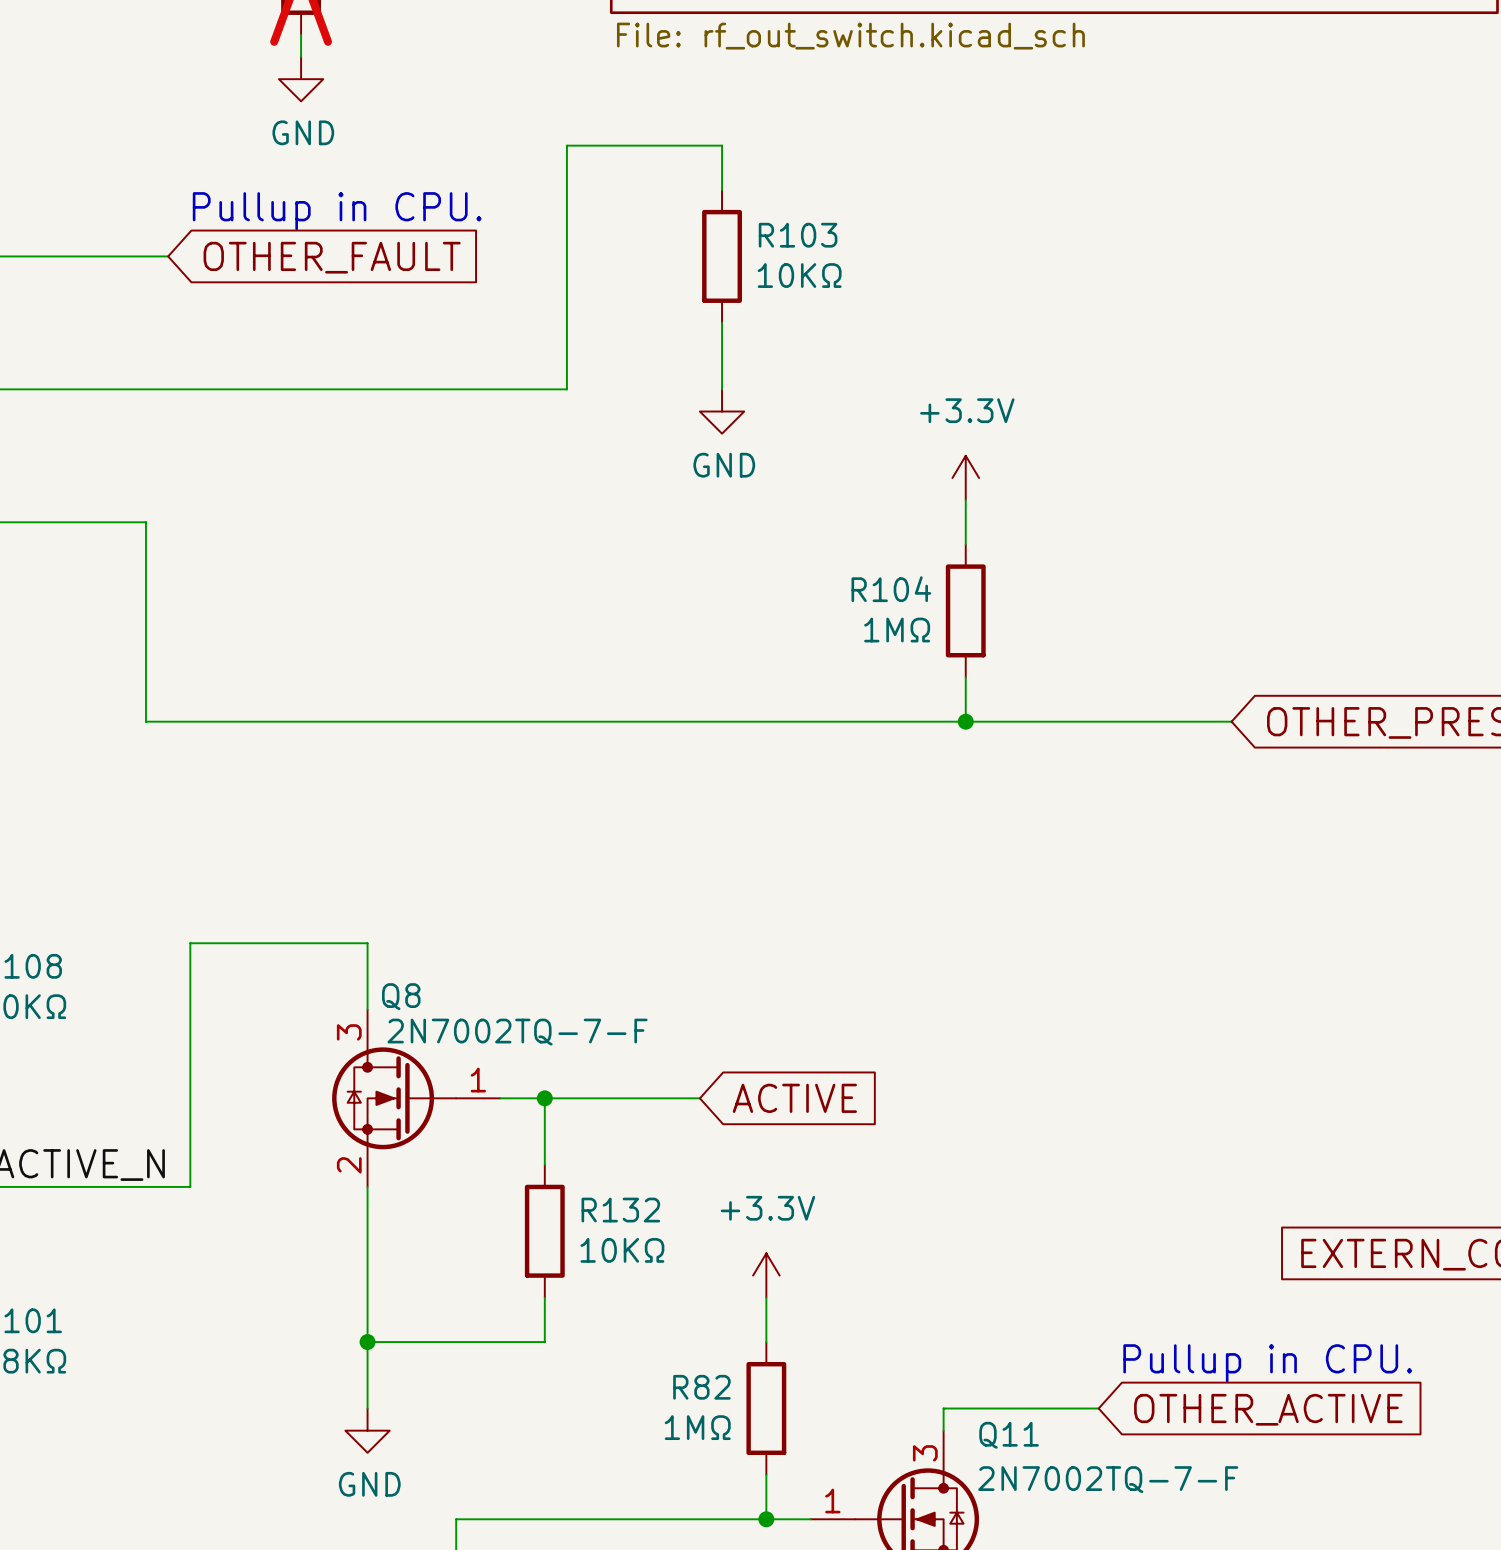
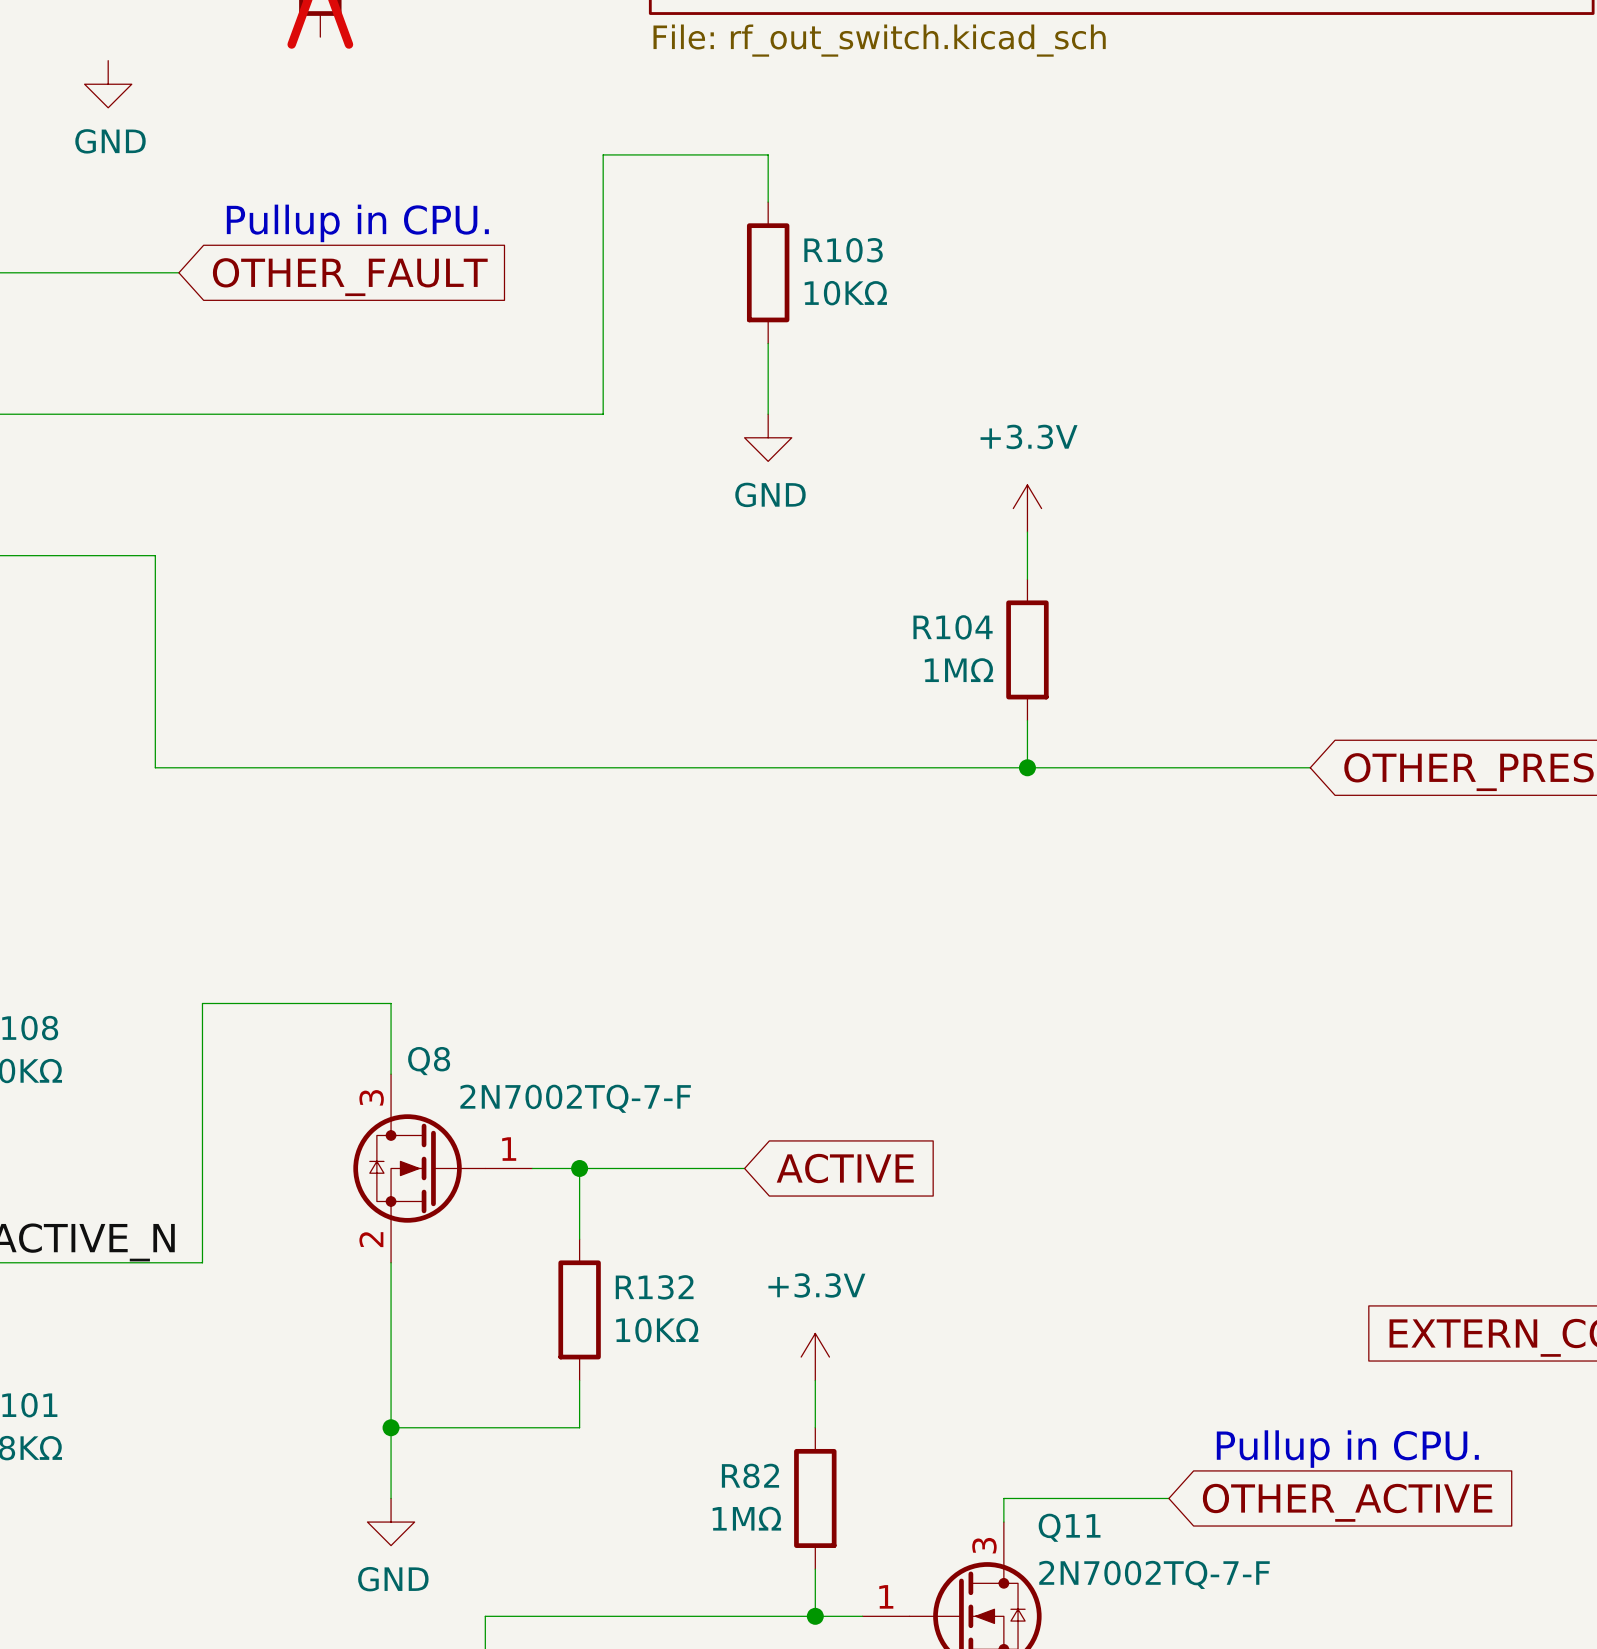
wire: (301, 34) (301, 57) -> none
power symbol: none -> GND (108, 84)
power symbol: GND (301, 79) -> none

